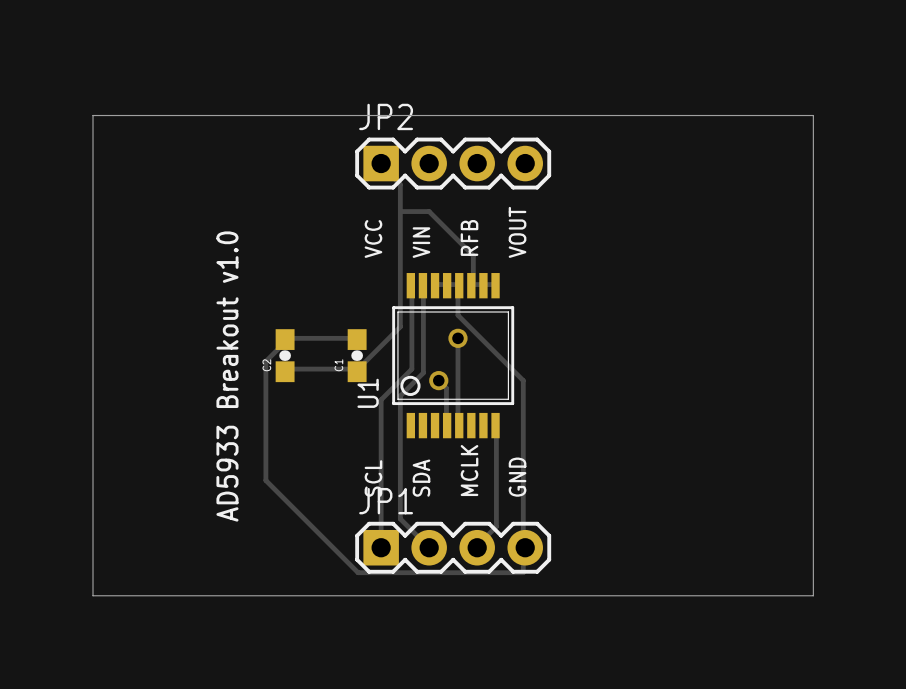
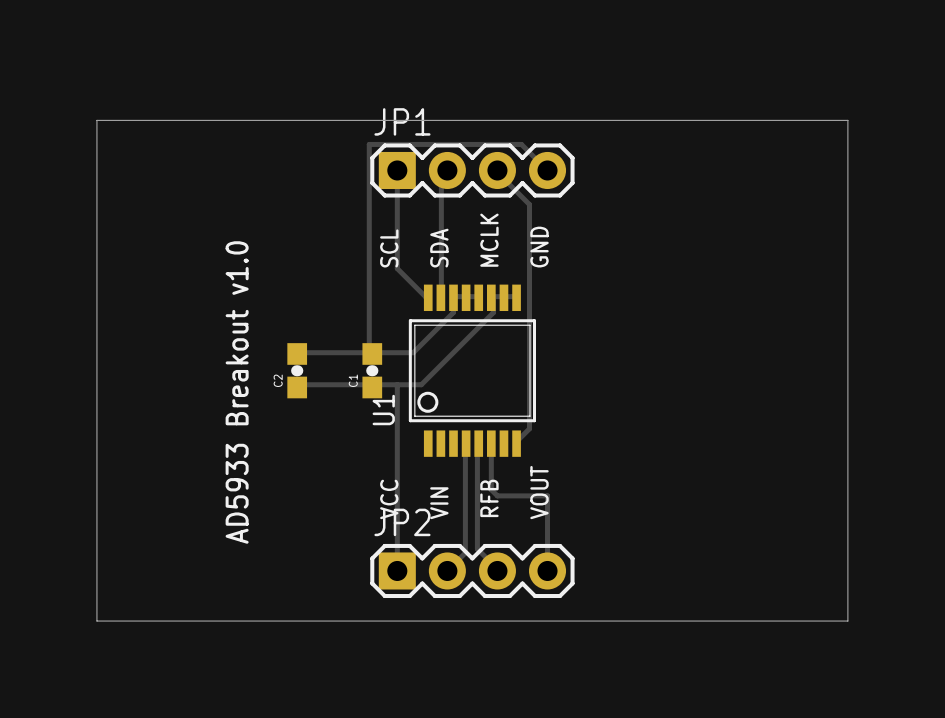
JP2 name: JP2 (386, 116) -> JP1 (402, 121)
track: none -> (447, 170) (441, 176) (440, 297)
track: none -> (497, 170) (529, 204) (529, 428) (516, 443)
track: none -> (547, 170) (521, 144) (369, 144) (369, 352)
track: (381, 165) (400, 184) (400, 326) (358, 369) -> (397, 172) (397, 268) (428, 297)
track: (400, 211) (429, 211) (473, 255) (473, 284) -> none
text: VOUT (517, 232) -> GND (539, 247)
text: RFB (469, 237) -> MCLK (489, 240)
text: VCC (373, 238) -> SCL (389, 248)
text: VIN (421, 242) -> SDA (439, 248)
track: (410, 285) (411, 369) (381, 399) -> (397, 384) (397, 416)
track: (422, 285) (423, 372) (400, 395) (400, 518) (429, 547) -> (466, 443) (465, 552) (447, 570)
track: none -> (453, 297) (453, 312) (413, 352) (372, 353)
track: (459, 285) (457, 315) (523, 380) (523, 545) (525, 547) (523, 549) (523, 572) (358, 572) (265, 480) (265, 361) (285, 342) (285, 339) -> none
track: none -> (491, 297) (493, 300) (493, 312) (421, 384) (373, 384)
track: (457, 338) (459, 425) -> none
via: (457, 338) -> none
track: (438, 380) (446, 388) (447, 425) -> none
via: (438, 380) -> none
track: none -> (491, 443) (491, 489) (497, 495) (547, 495) (547, 570)
track: (495, 425) (496, 526) (477, 545) -> (478, 443) (477, 548) (497, 568)
text: MCLK (469, 470) -> RFB (489, 498)
text: GND (517, 477) -> VOUT (539, 492)
text: SCL (373, 478) -> VCC (389, 499)
text: SDA (421, 478) -> VIN (439, 503)
JP1 name: JP1 (386, 501) -> JP2 (402, 522)

